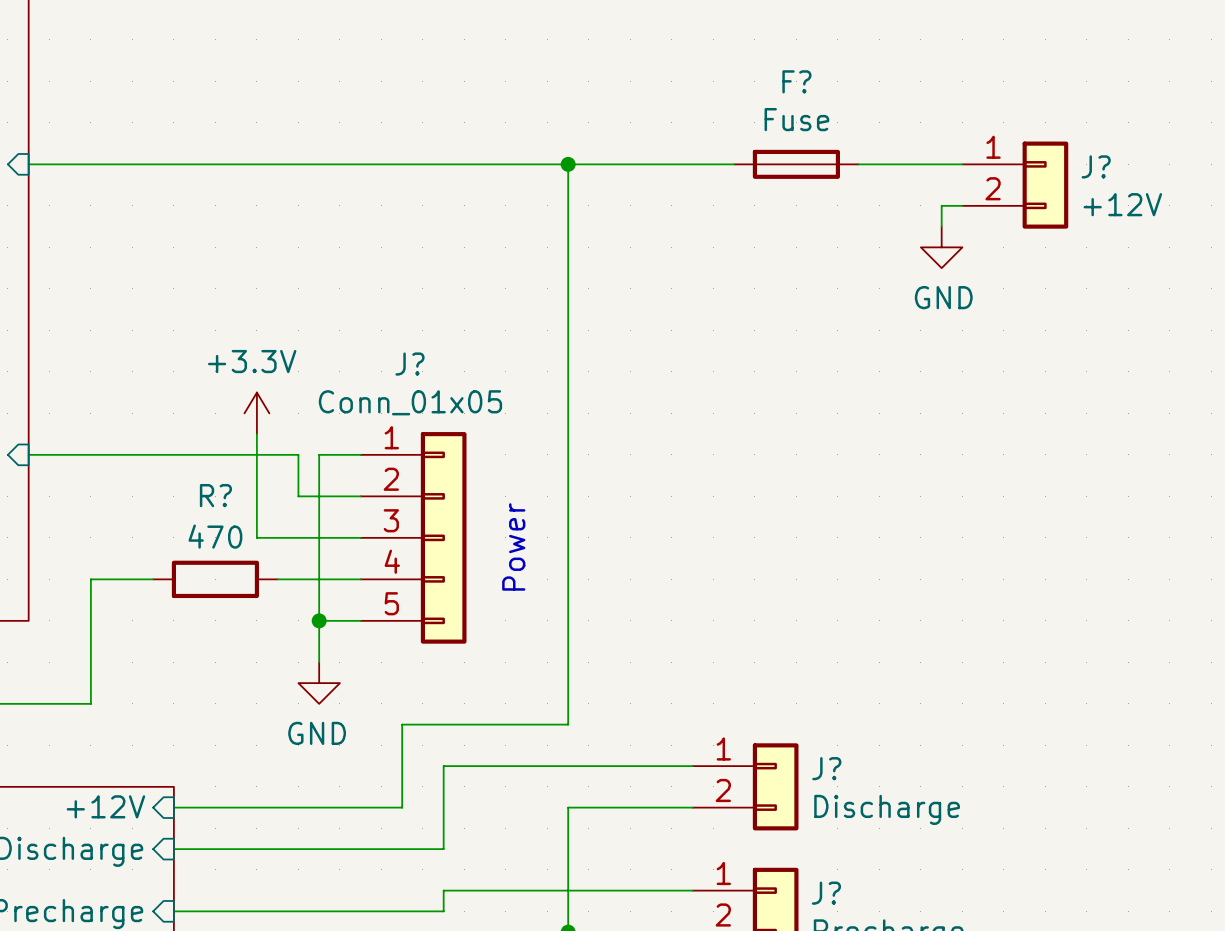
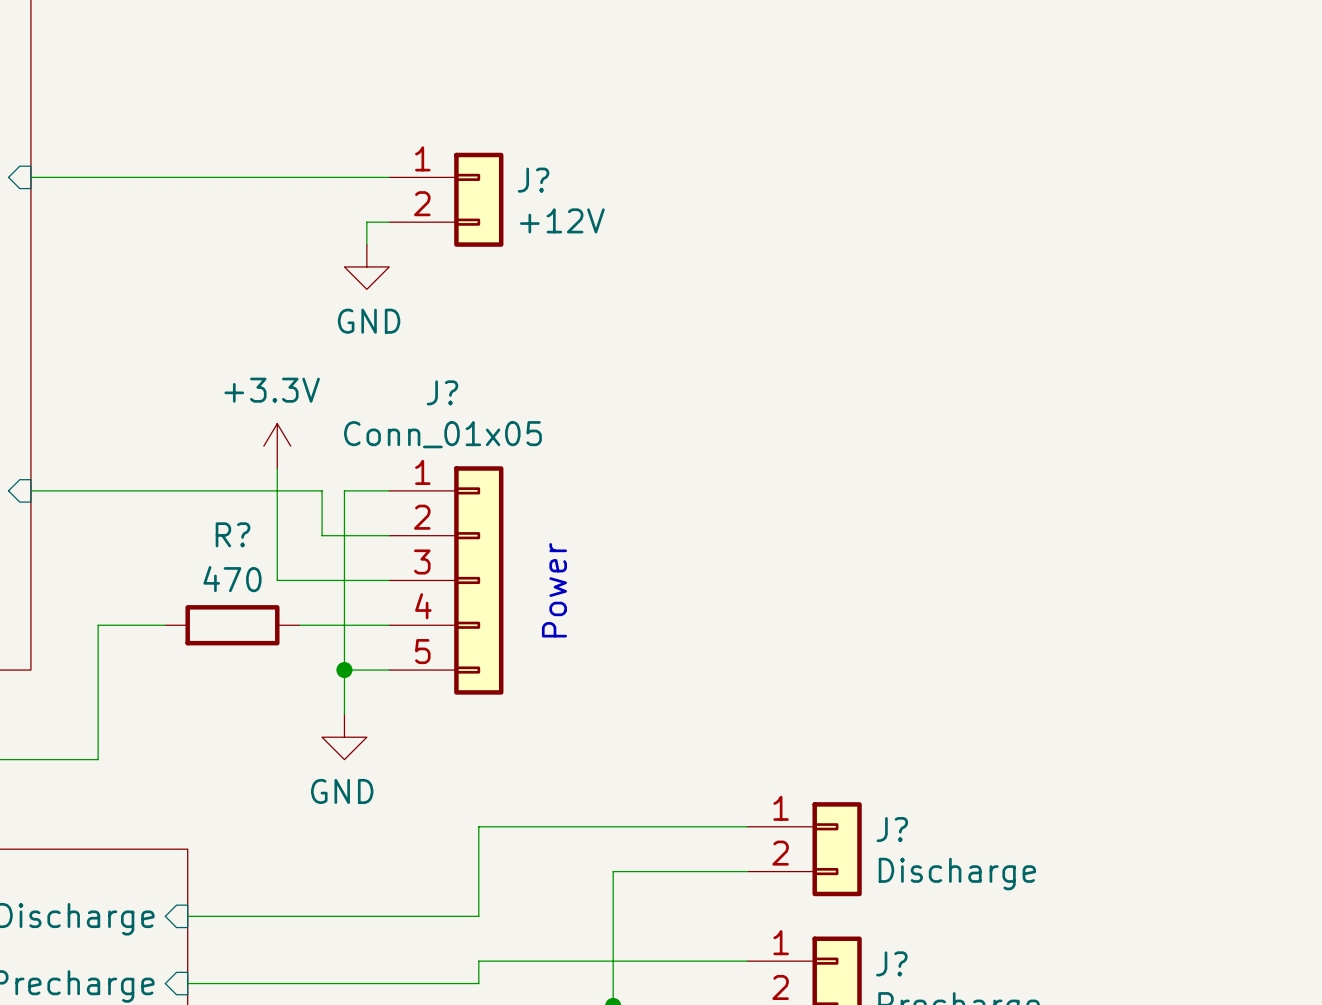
wire: (360, 164) (734, 164) -> none
wire: (568, 164) (568, 724) (402, 724) (402, 807) (173, 807) -> none
junction: (568, 164) -> none
F?: Fuse (796, 164) -> none
wire: (858, 164) (962, 164) -> none
J?: none -> +12V (446, 199)
J?: +12V (1015, 185) -> none
wire: none -> (389, 222) (366, 222) (366, 244)
wire: (962, 205) (941, 205) (941, 226) -> none
power symbol: none -> GND (366, 266)
power symbol: GND (941, 247) -> none
sheet pin: +12V (105, 806) -> none

